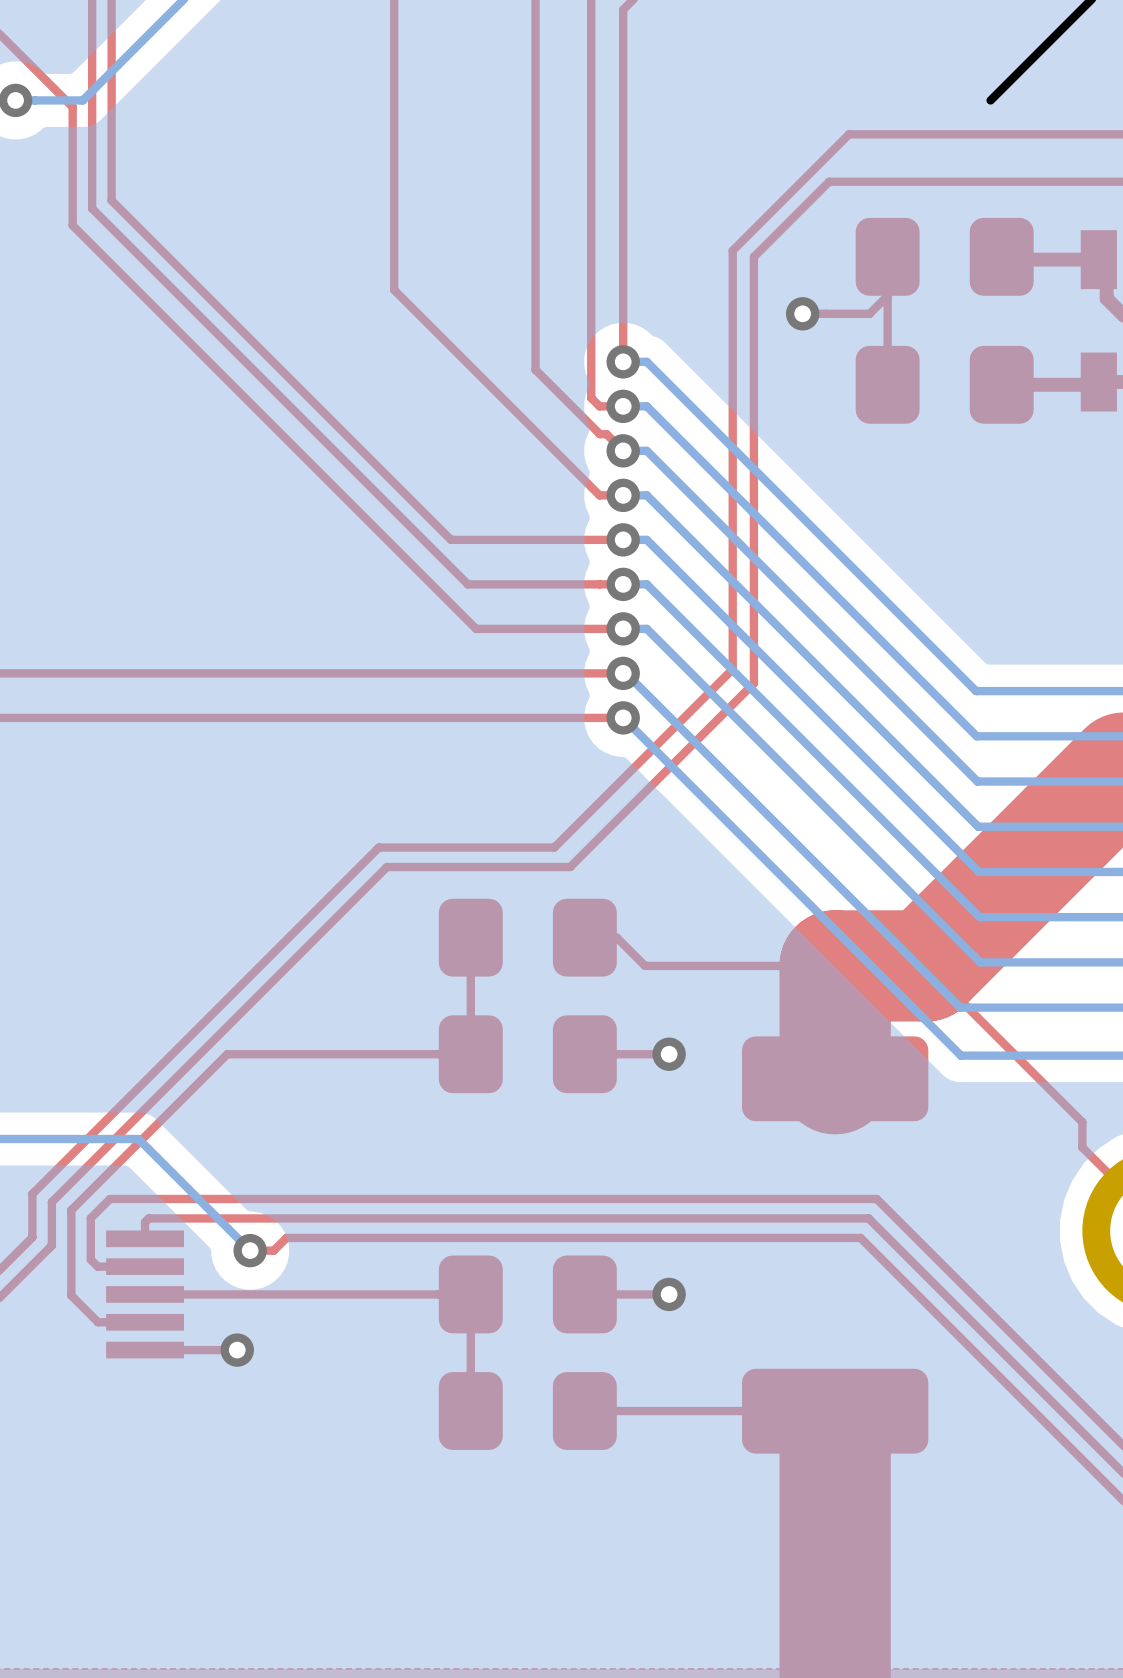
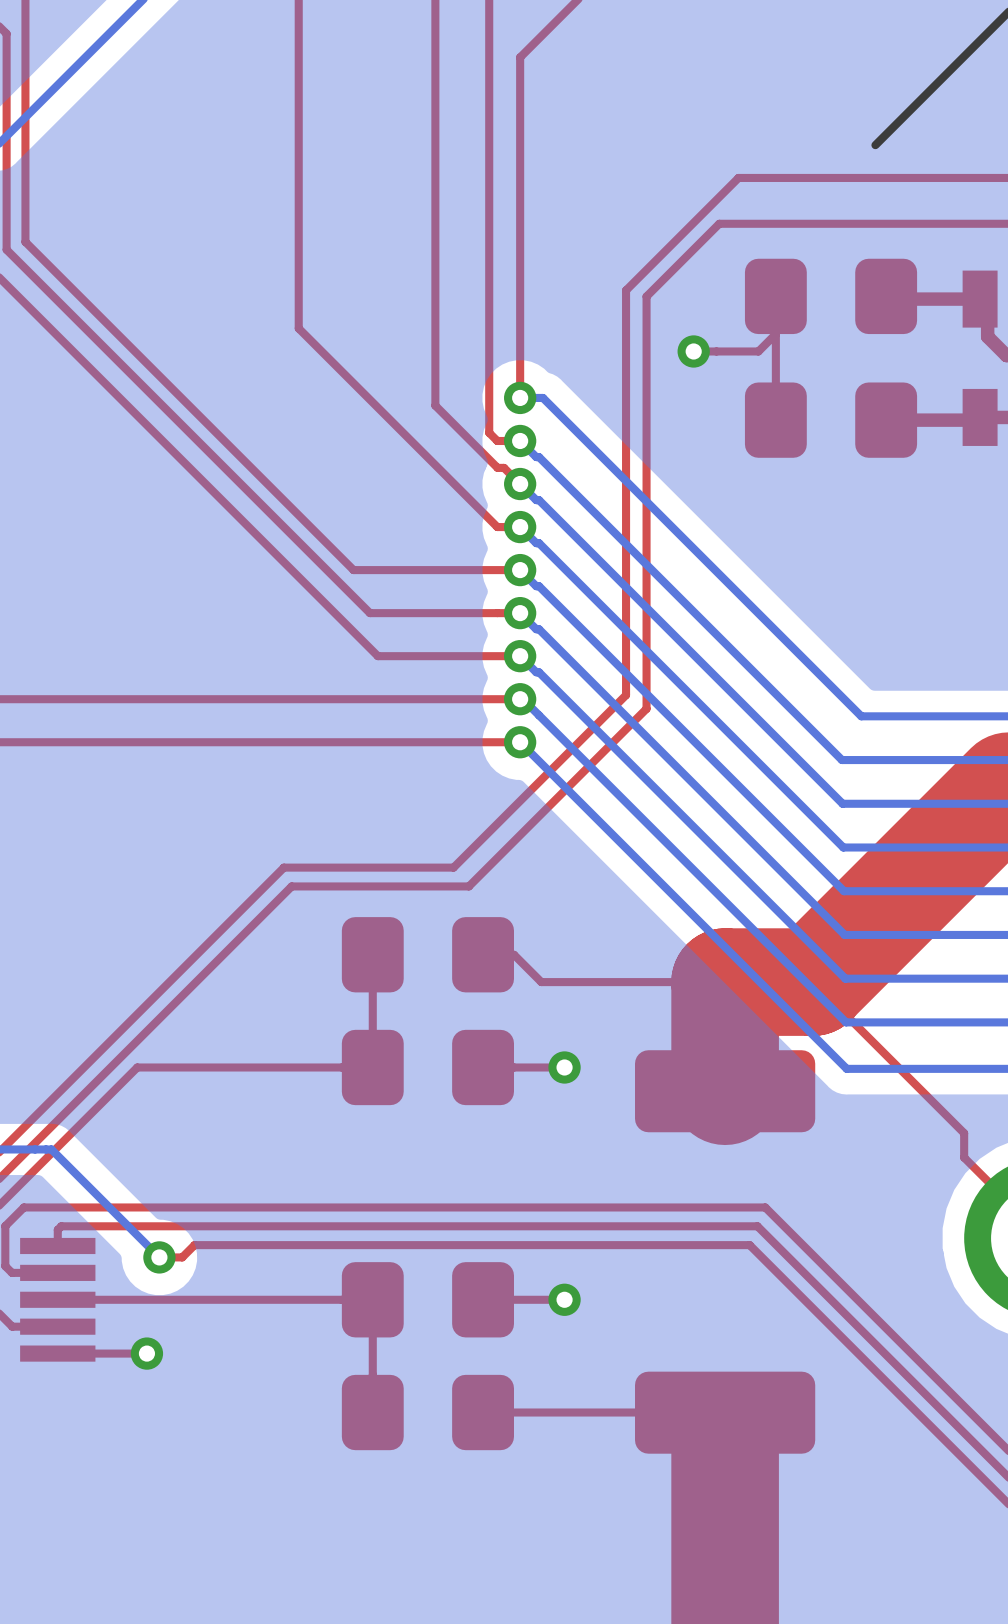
bottom track: (623, 406) (646, 406) (976, 736) -> (520, 440) (536, 457) (539, 457) (841, 760) (862, 760)
bottom track: (623, 450) (646, 450) (977, 781) -> (520, 484) (536, 500) (539, 500) (842, 803) (862, 803)
bottom track: (623, 495) (646, 495) (978, 826) -> (520, 527) (536, 543) (539, 543) (843, 847) (863, 847)
bottom track: (623, 539) (646, 539) (978, 871) -> (520, 570) (536, 586) (539, 586) (844, 891) (864, 891)
bottom track: (623, 584) (646, 584) (979, 917) -> (520, 613) (536, 629) (539, 629) (844, 934) (864, 934)
bottom track: (623, 628) (646, 628) (980, 962) -> (520, 656) (536, 672) (539, 672) (845, 978) (865, 978)

